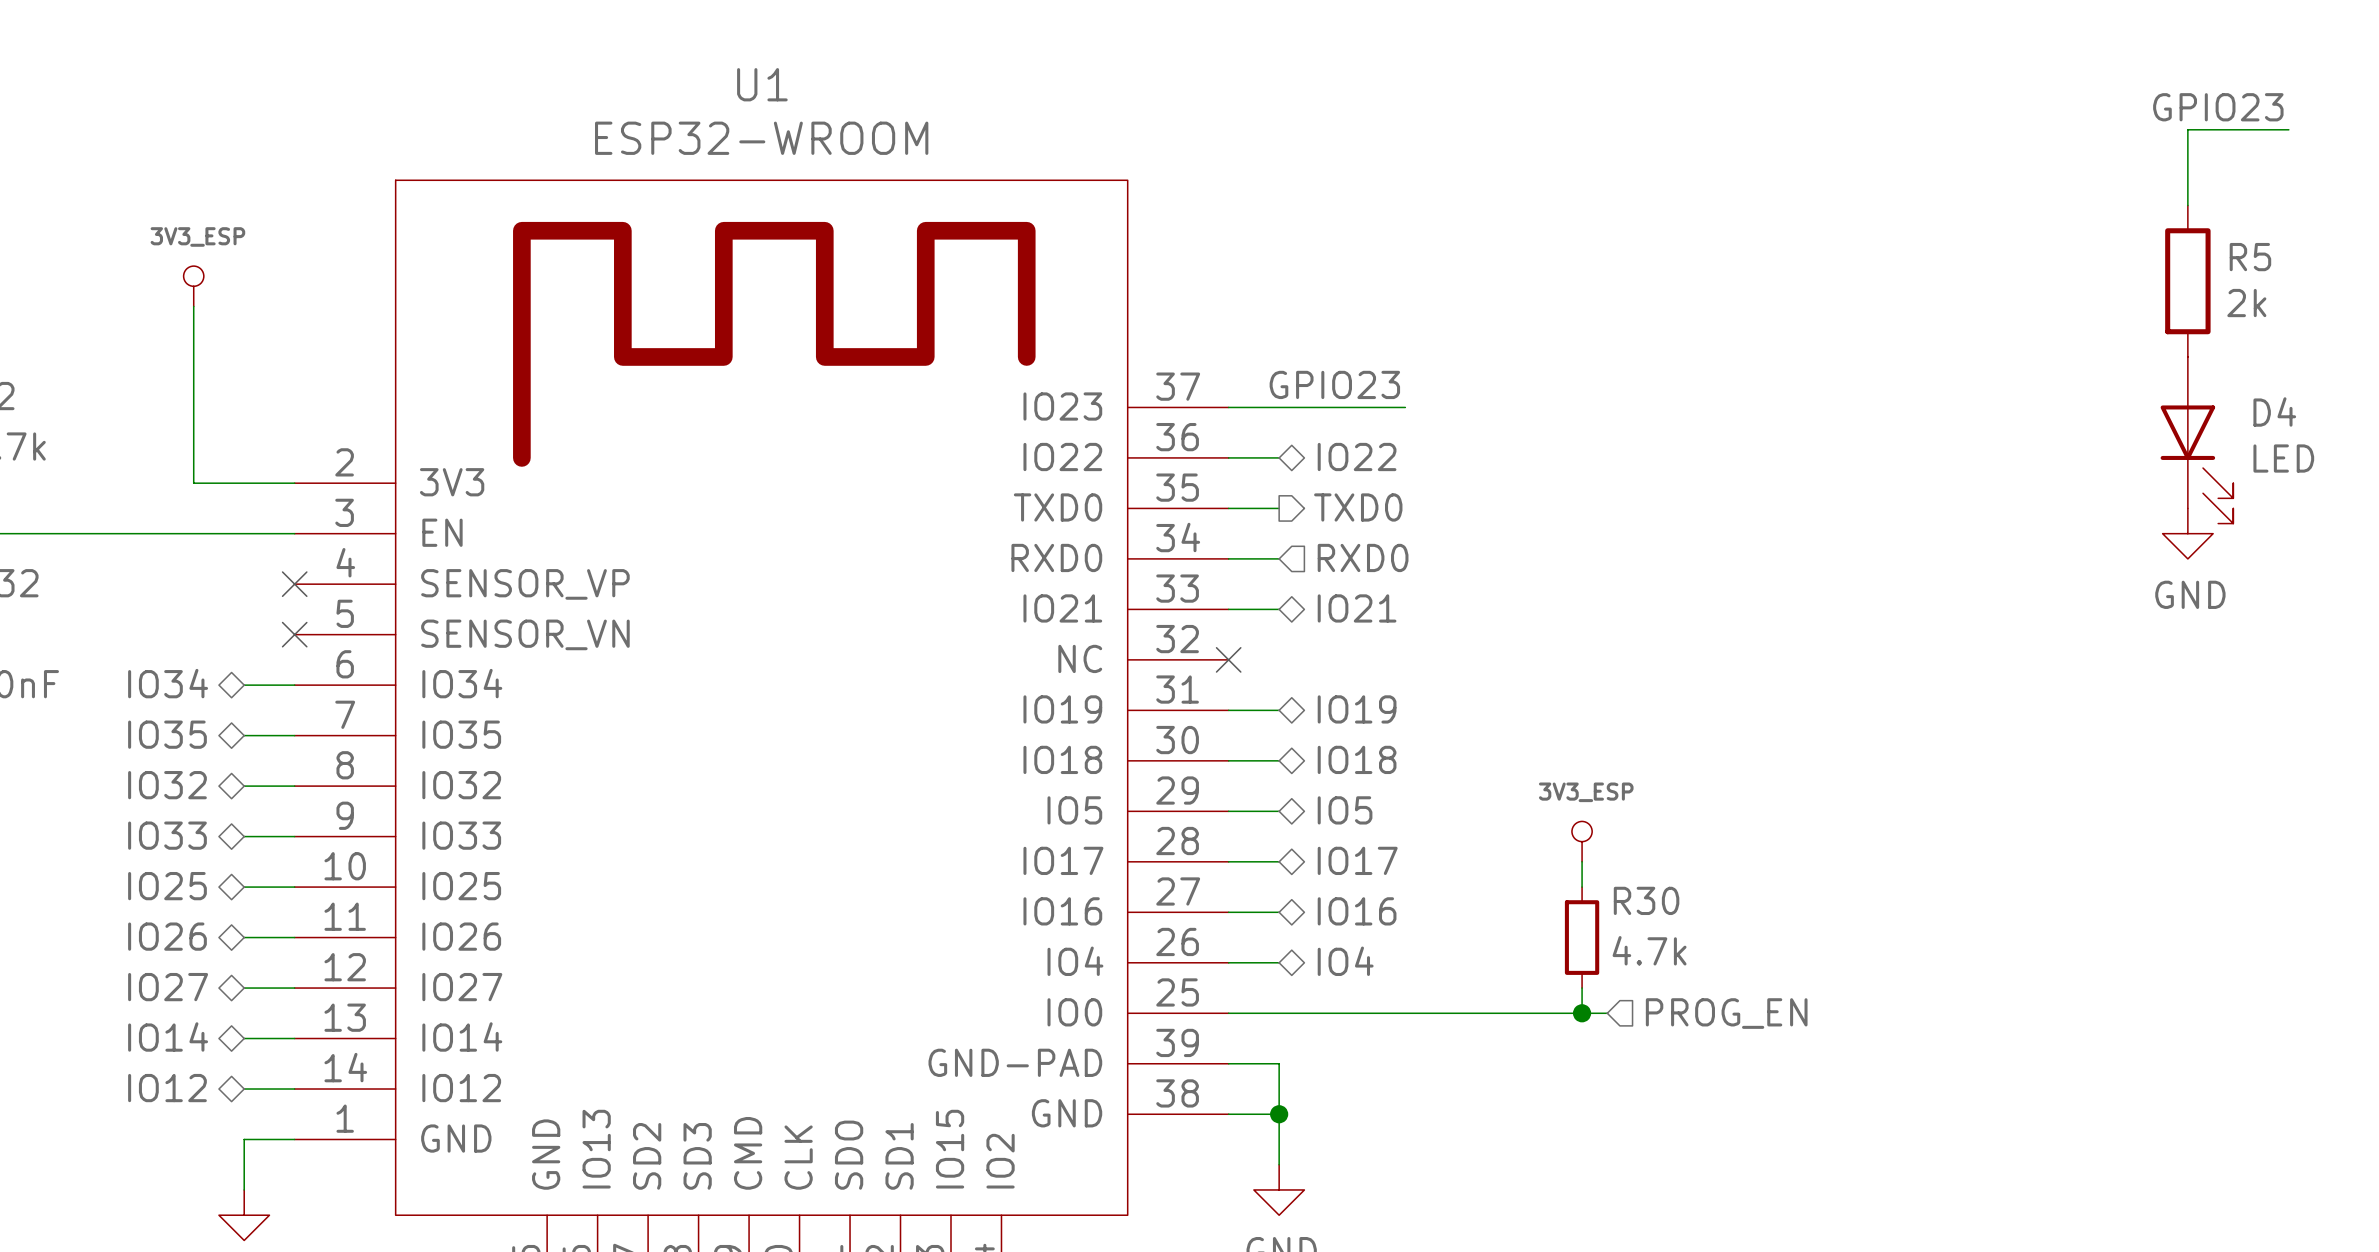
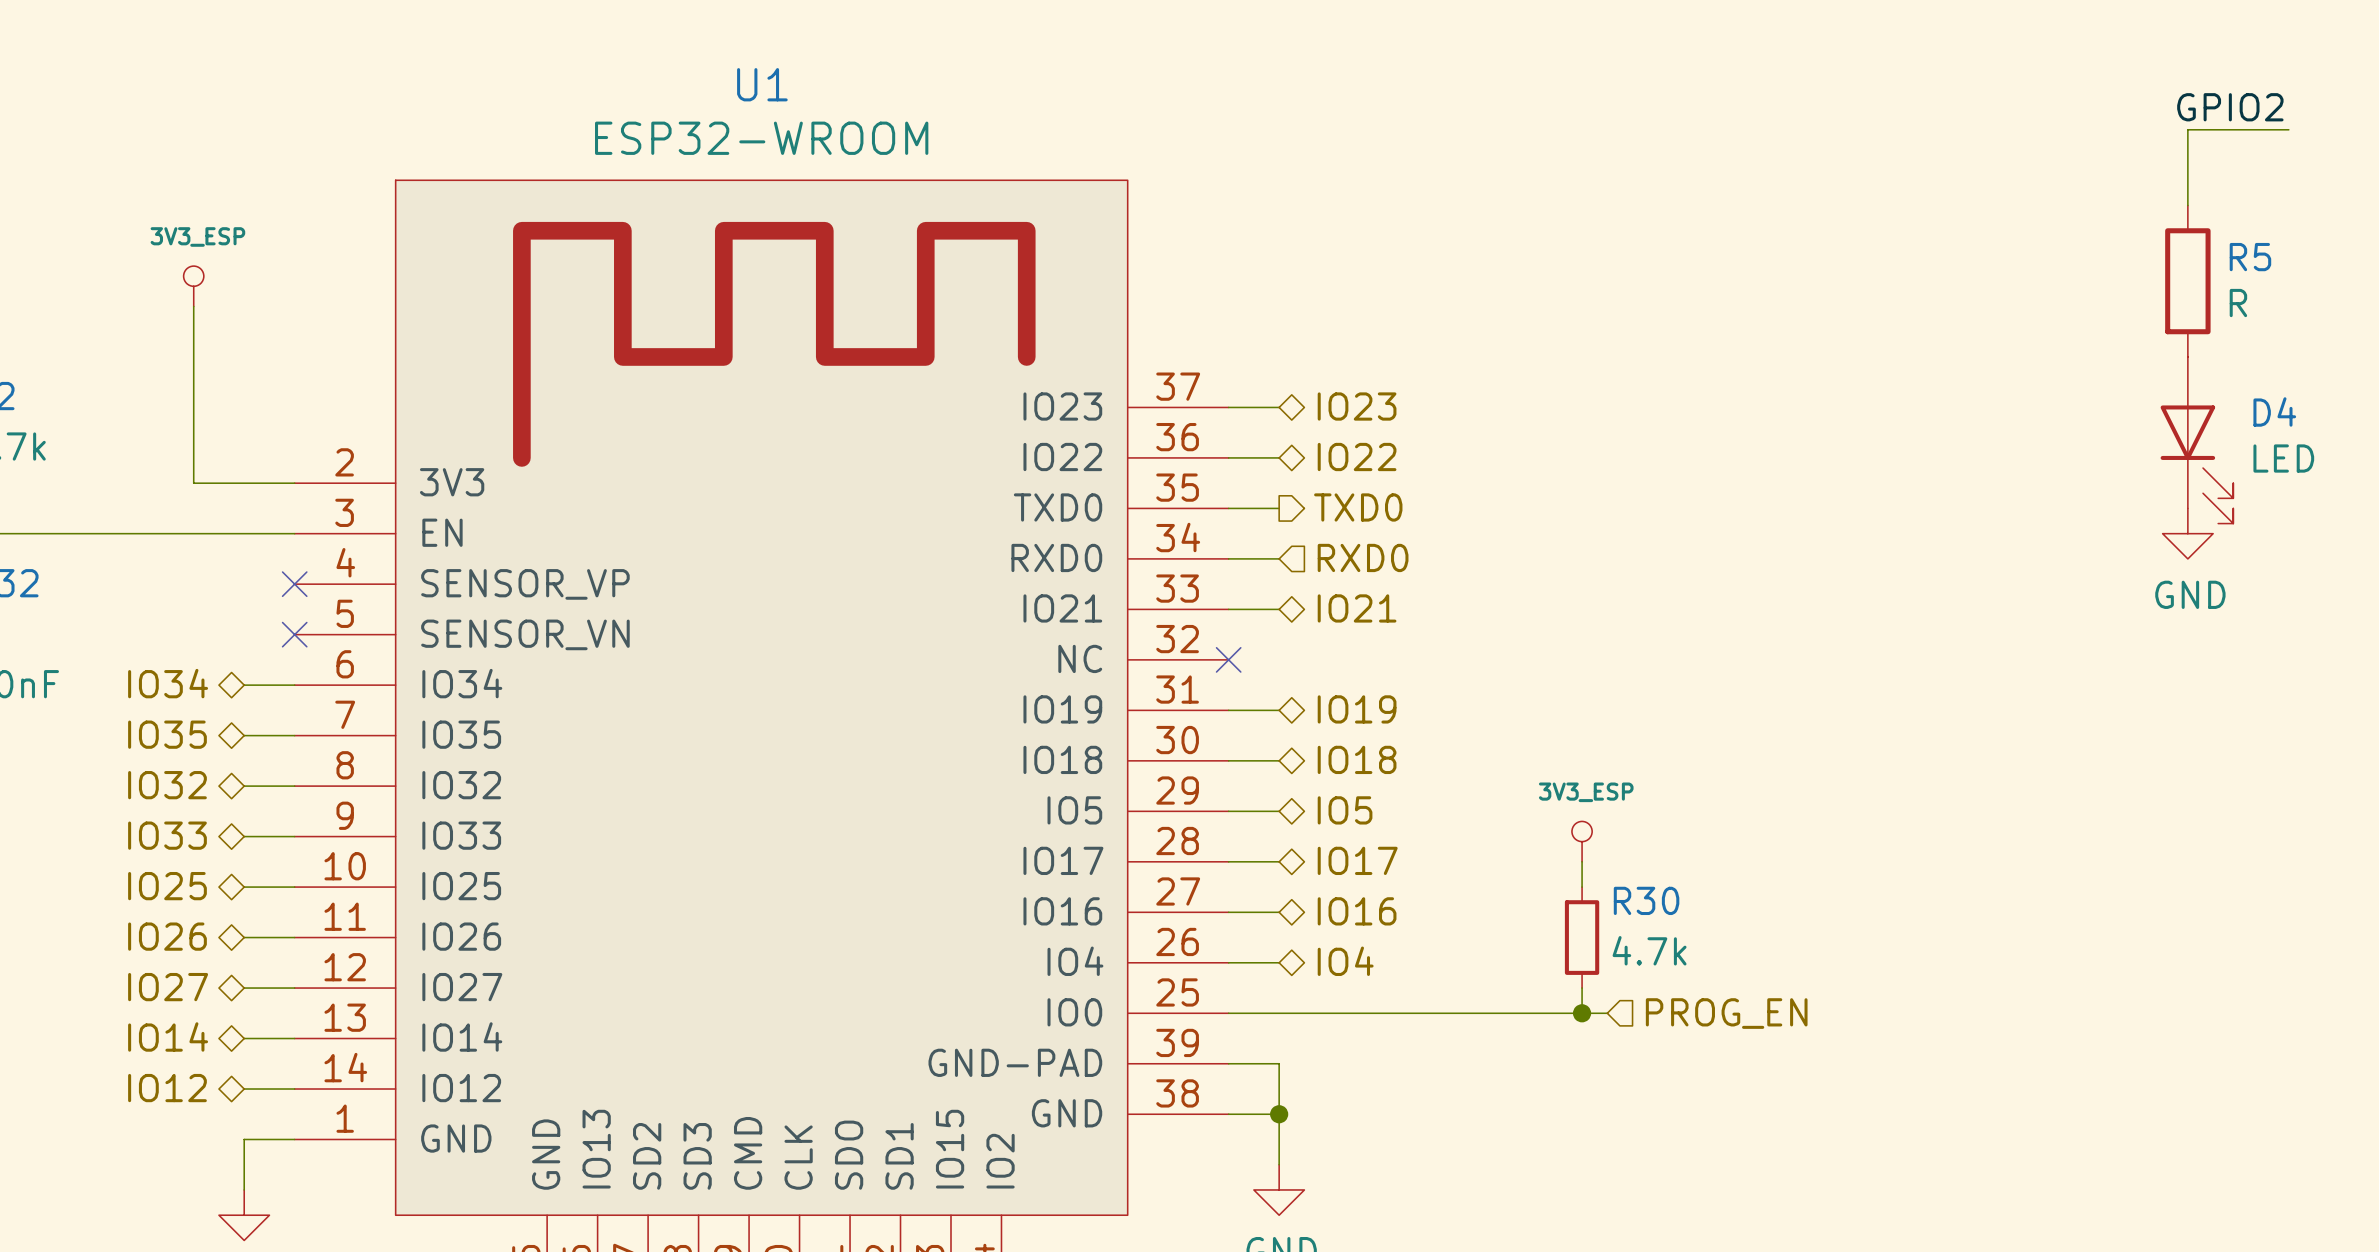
label: GPIO23 (2218, 107) -> GPIO2 (2230, 107)
R5 value: 2k (2246, 303) -> R (2238, 303)
label: GPIO23 (1334, 384) -> none
hierarchical label: none -> IO23 (1357, 406)
wire: (1279, 407) (1405, 407) -> none

